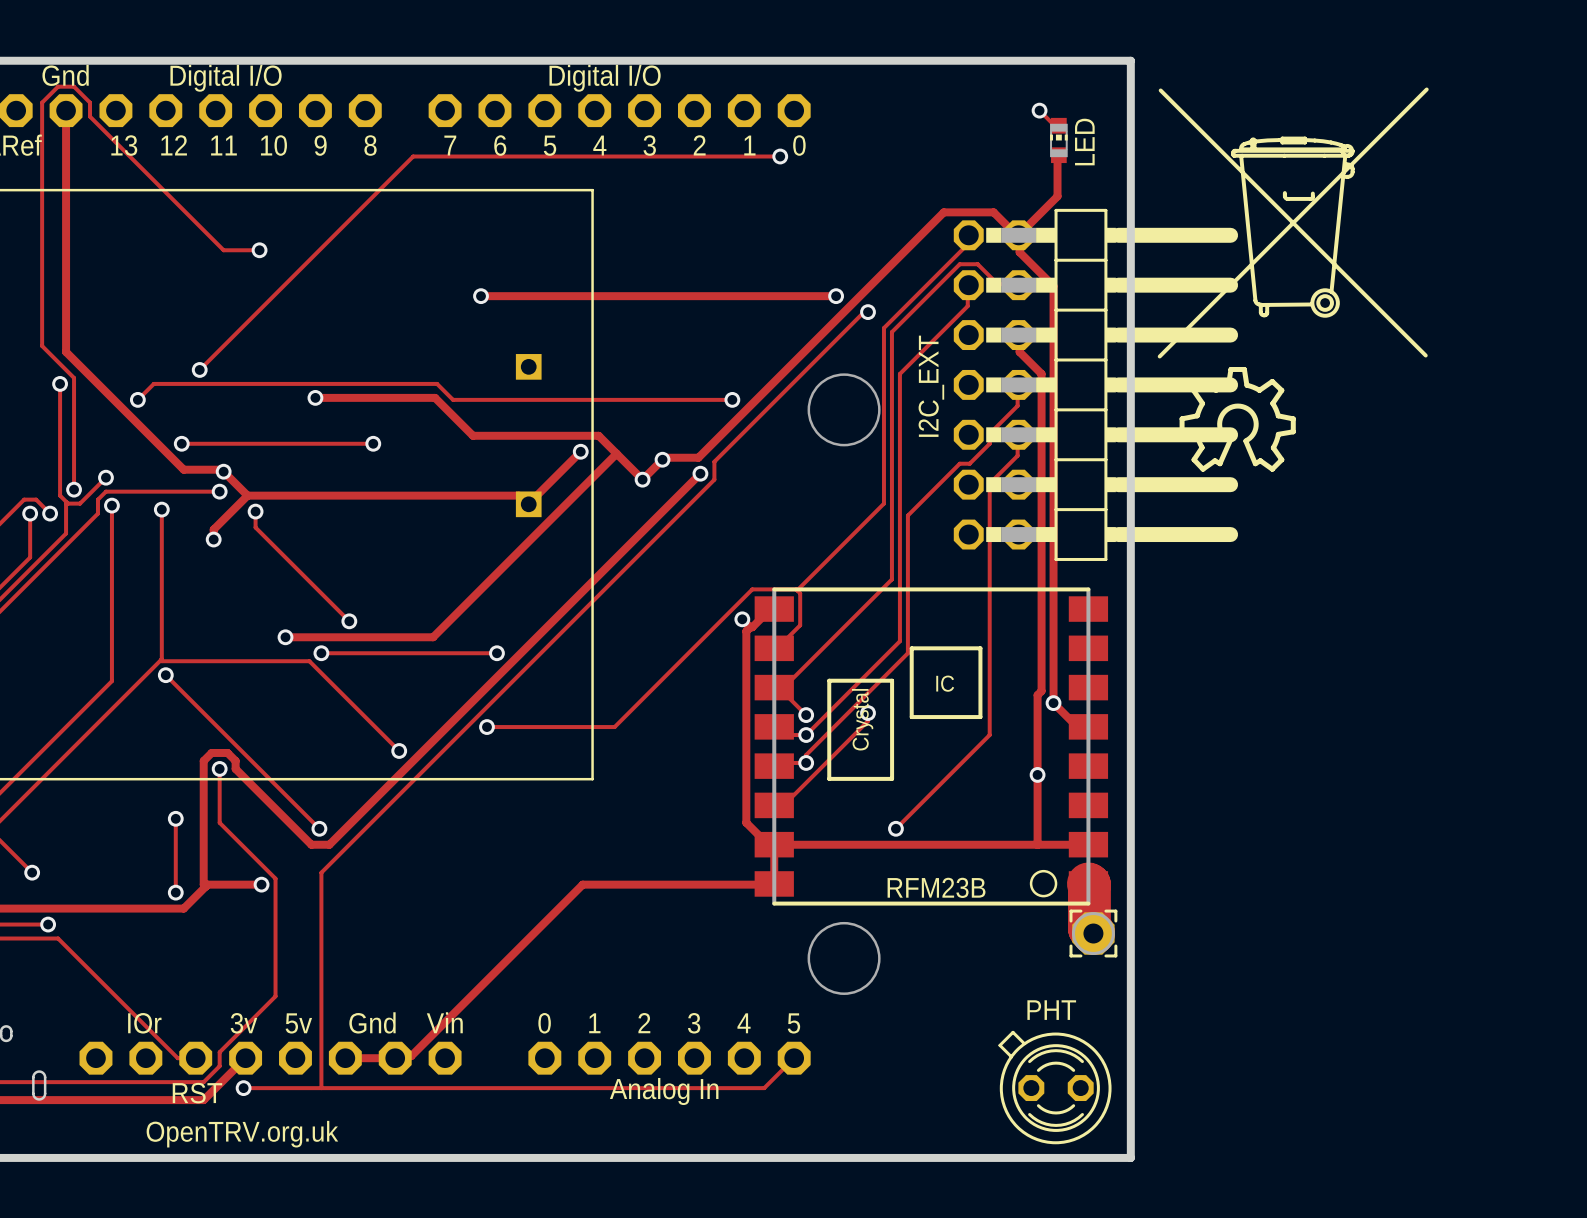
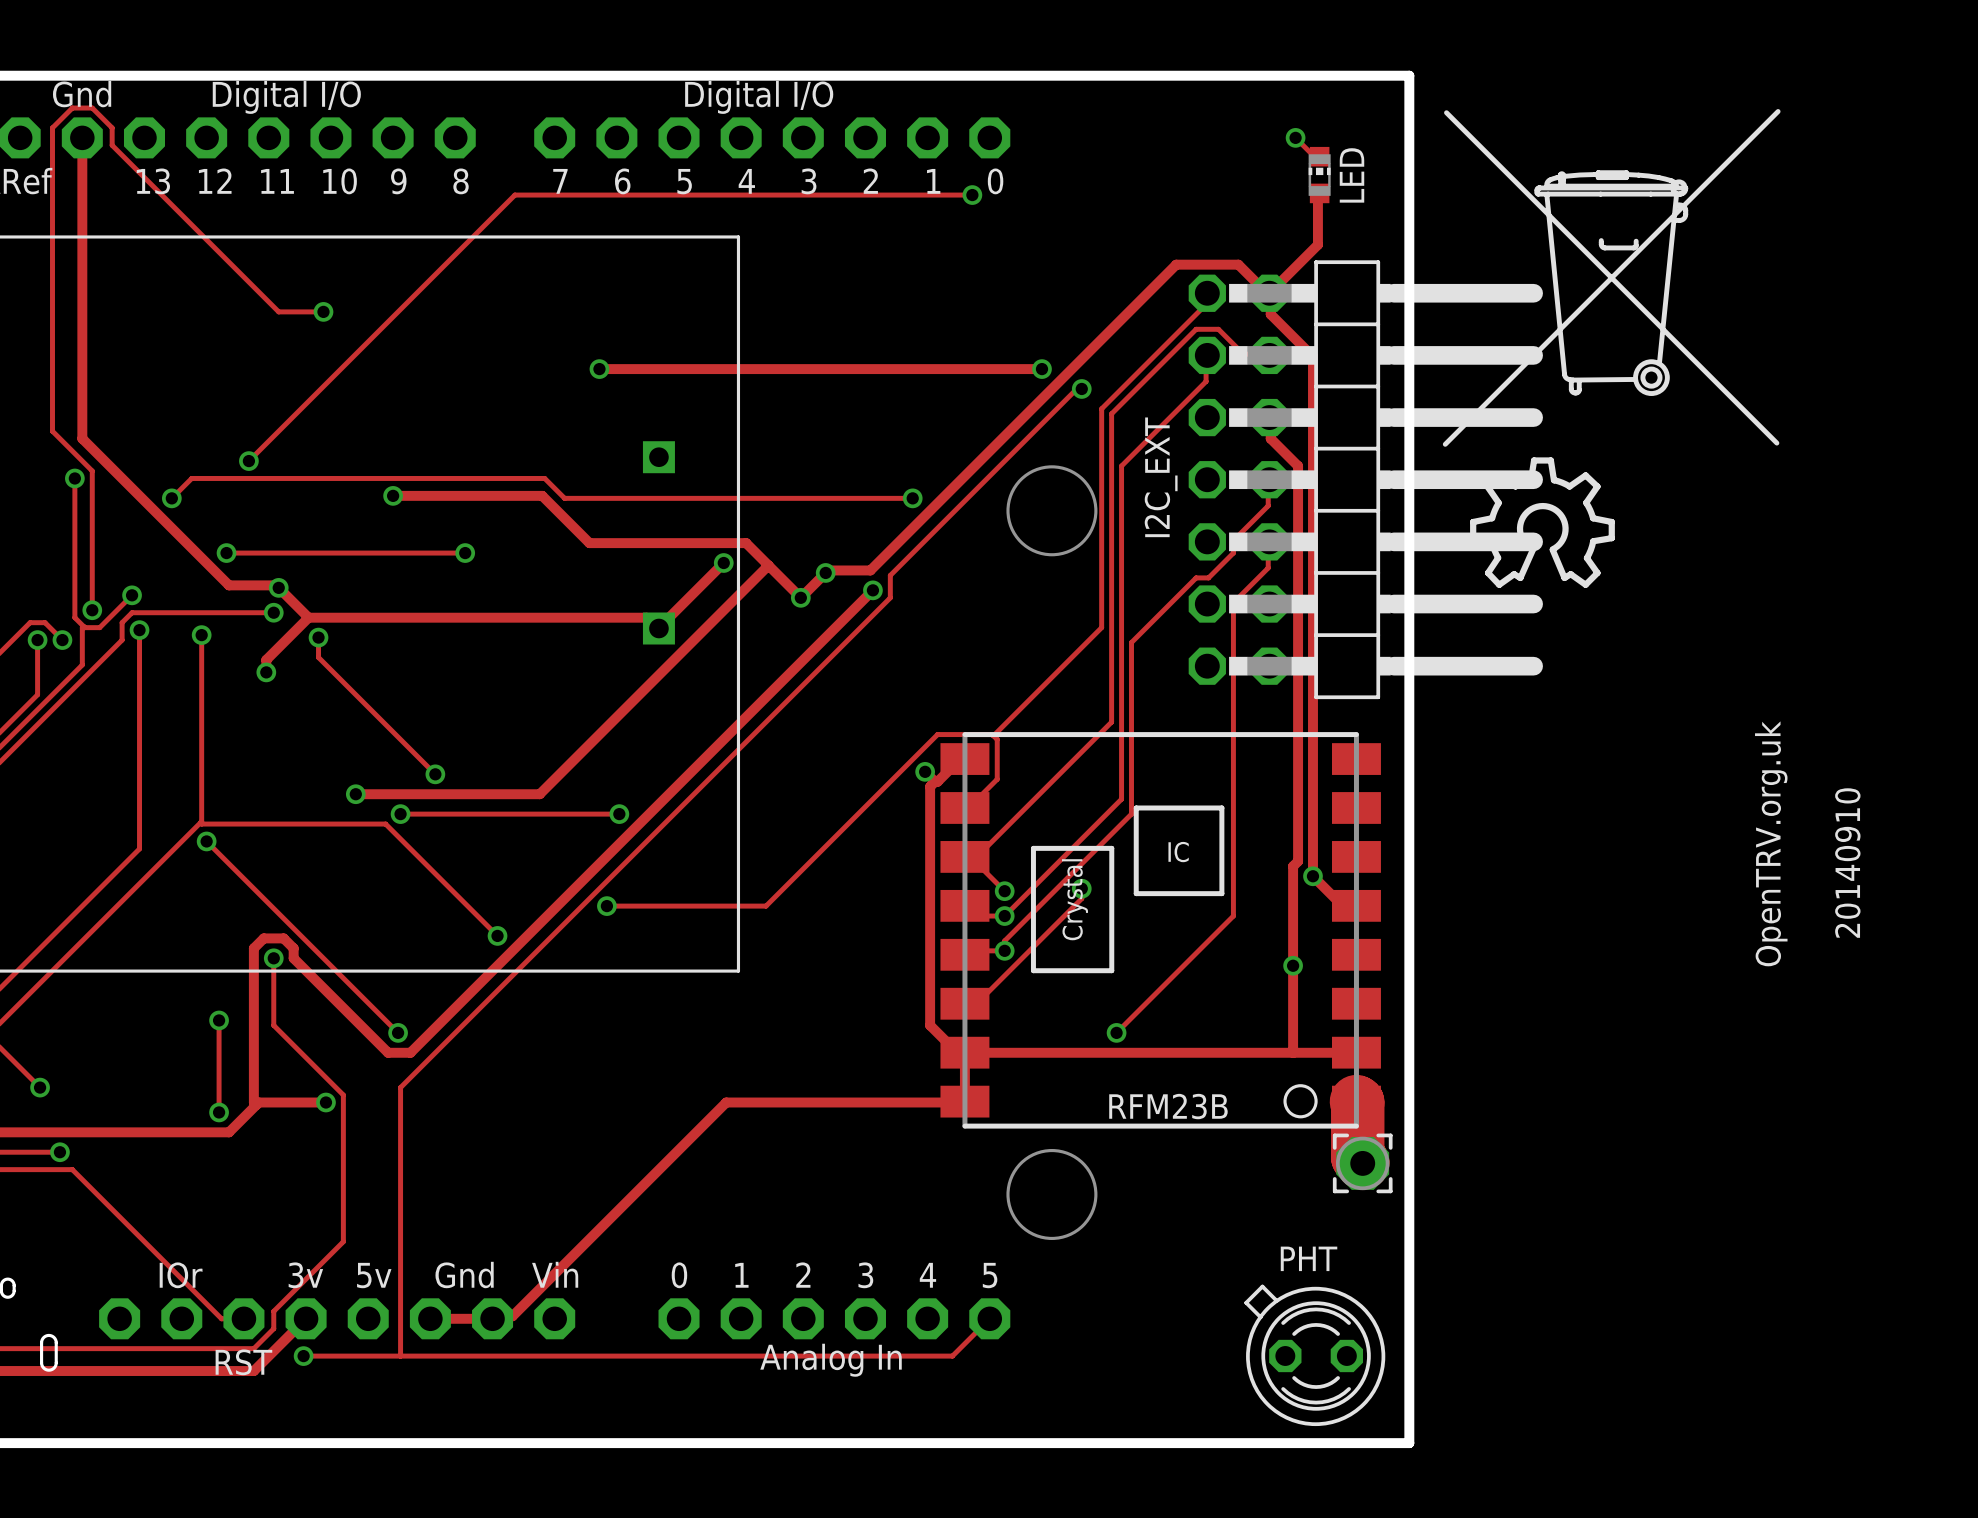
text: none -> OpenTRV.org.uk (1771, 843)
text: none -> 20140910 (1847, 863)
text: OpenTRV.org.uk (242, 1134) -> none

